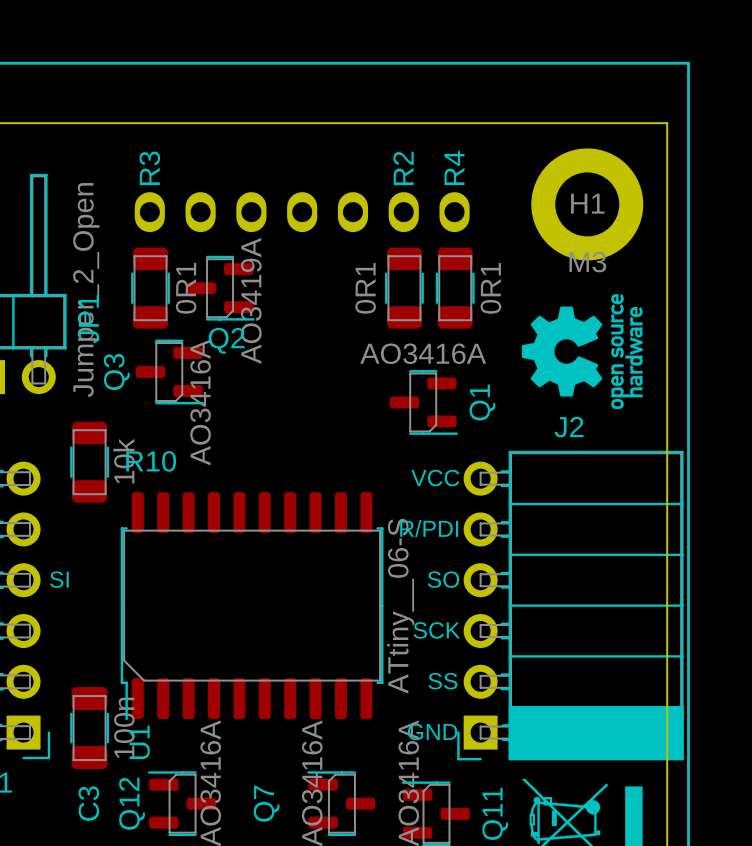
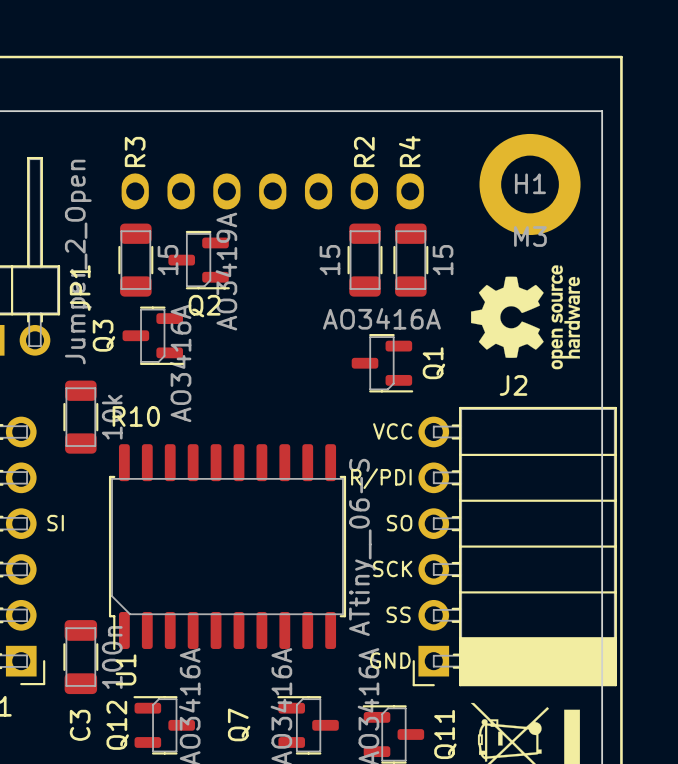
R3 value: 0R1 (186, 288) -> 15 (168, 260)
R2 value: 0R1 (365, 288) -> 15 (329, 260)
R4 value: 0R1 (490, 288) -> 15 (443, 260)

